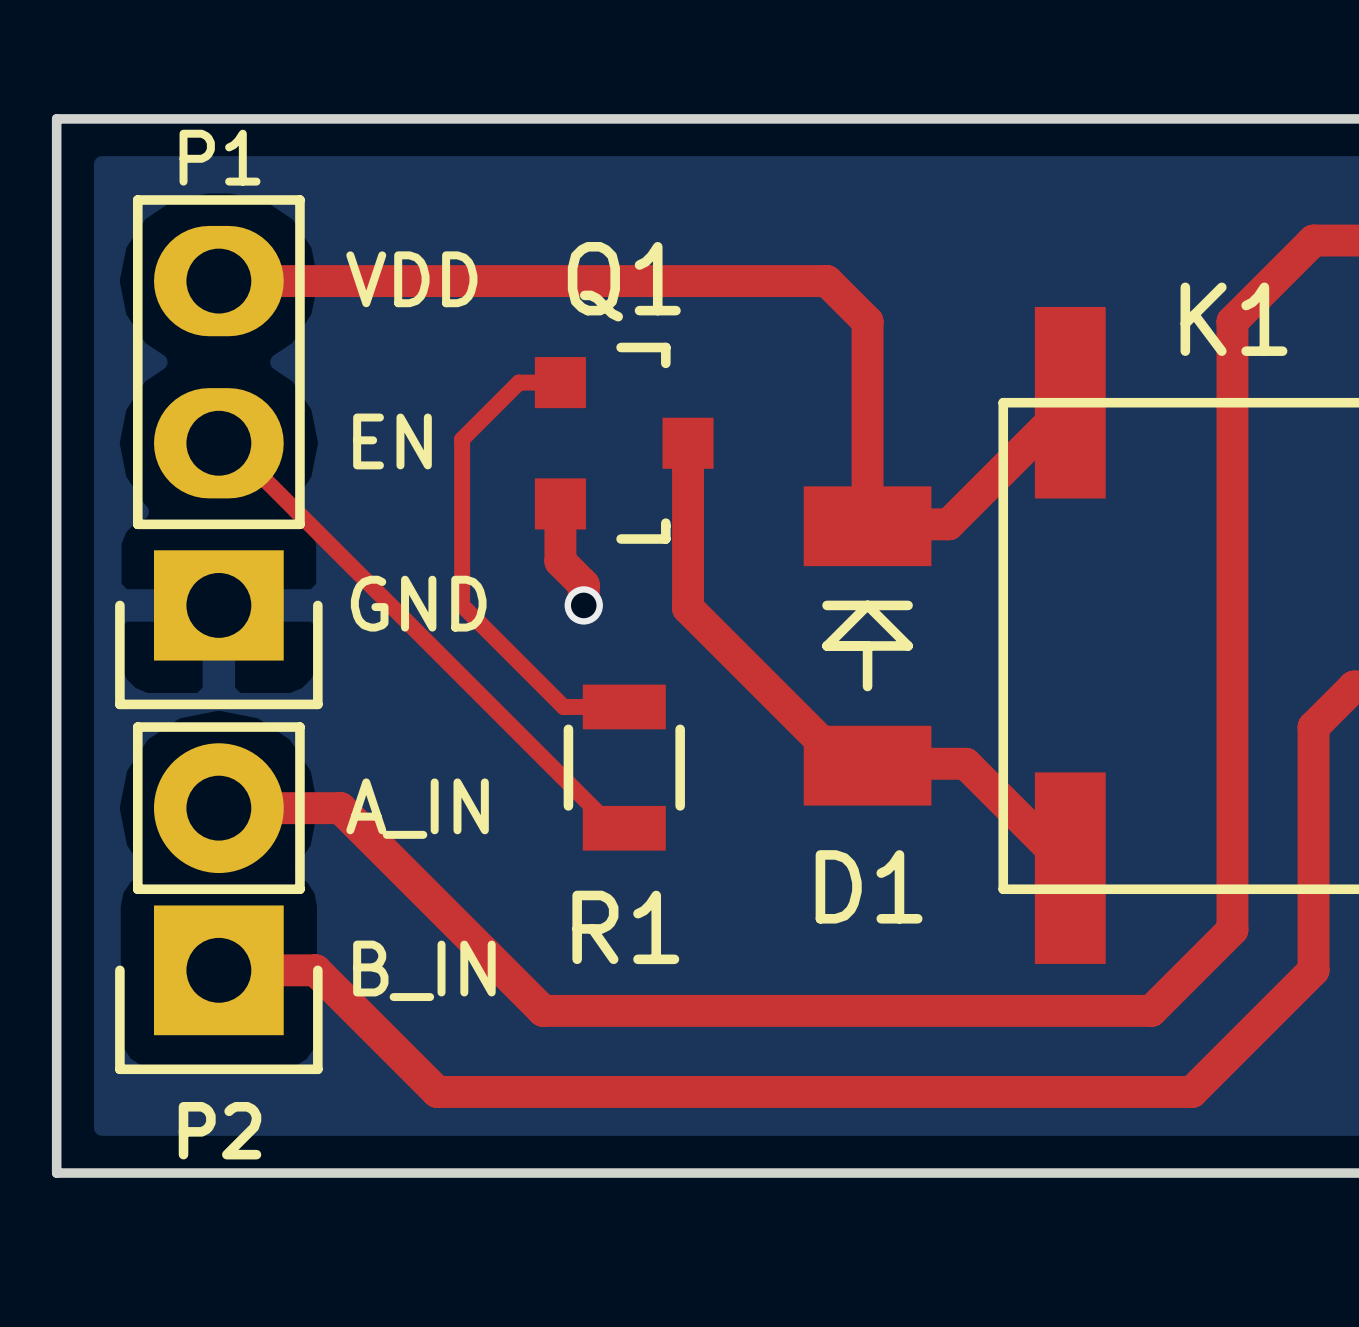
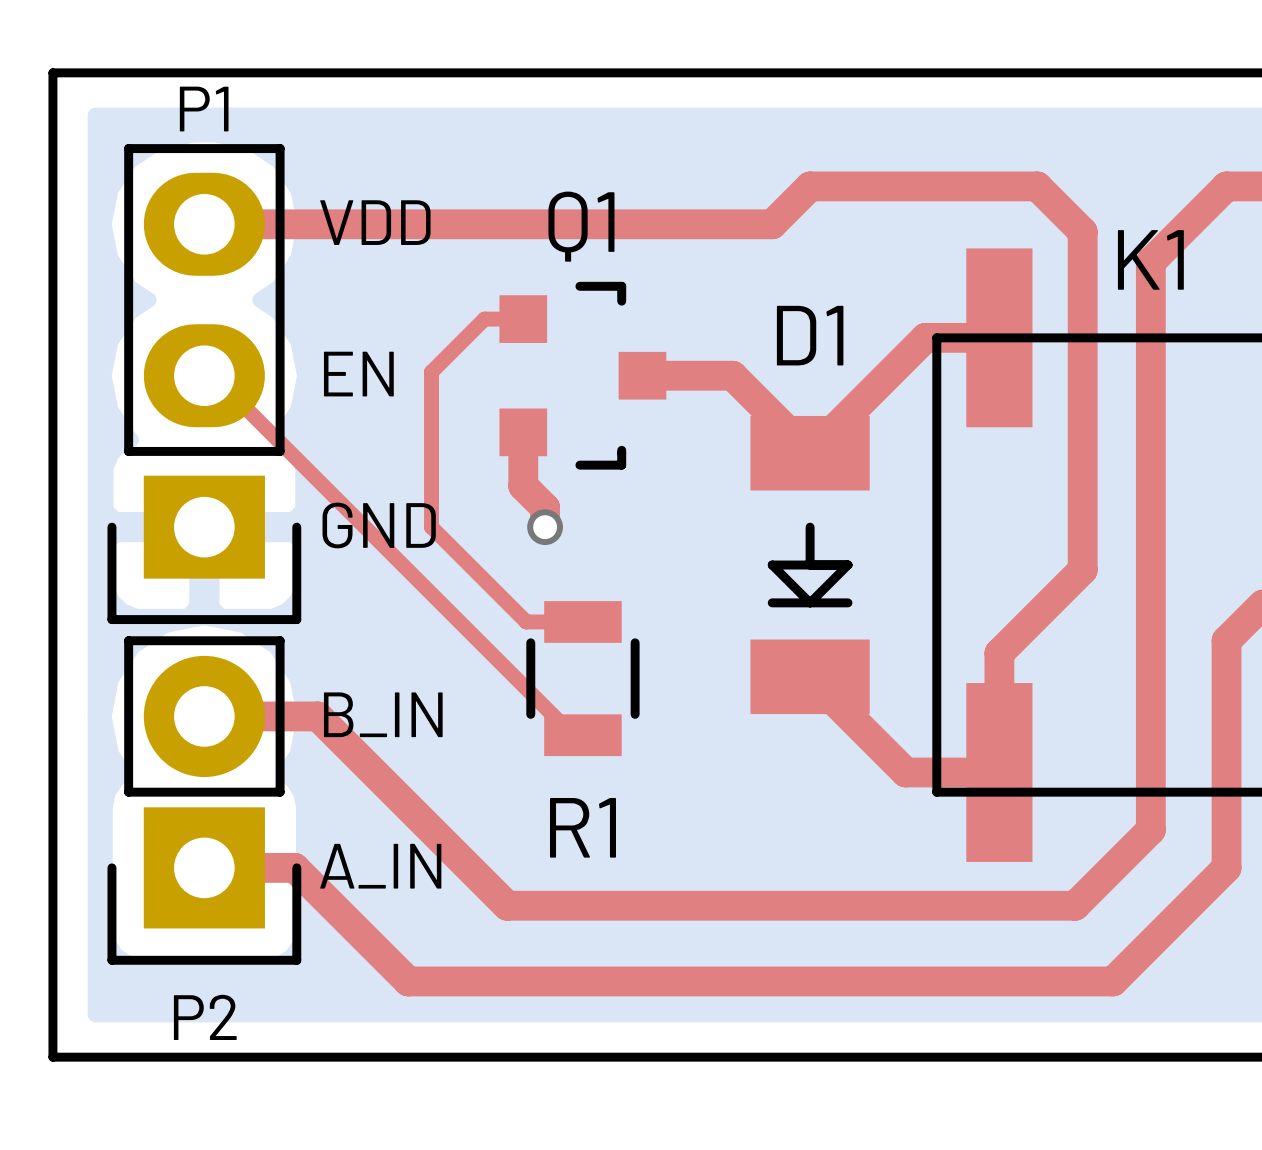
top track: (827, 281) (867, 321) (867, 524) (948, 524) (1070, 402) -> (642, 375) (732, 375) (810, 453) (925, 337) (999, 337)
top track: none -> (772, 224) (810, 186) (1037, 186) (1082, 231) (1082, 569) (999, 653) (999, 772) (905, 772) (810, 676)
top track: (688, 443) (688, 608) (843, 763) (965, 763) (1070, 868) -> none
D1 rotation: 0° (867, 645) -> 180° (810, 565)
text: A_IN (417, 808) -> B_IN (383, 714)
text: B_IN (424, 970) -> A_IN (380, 866)

